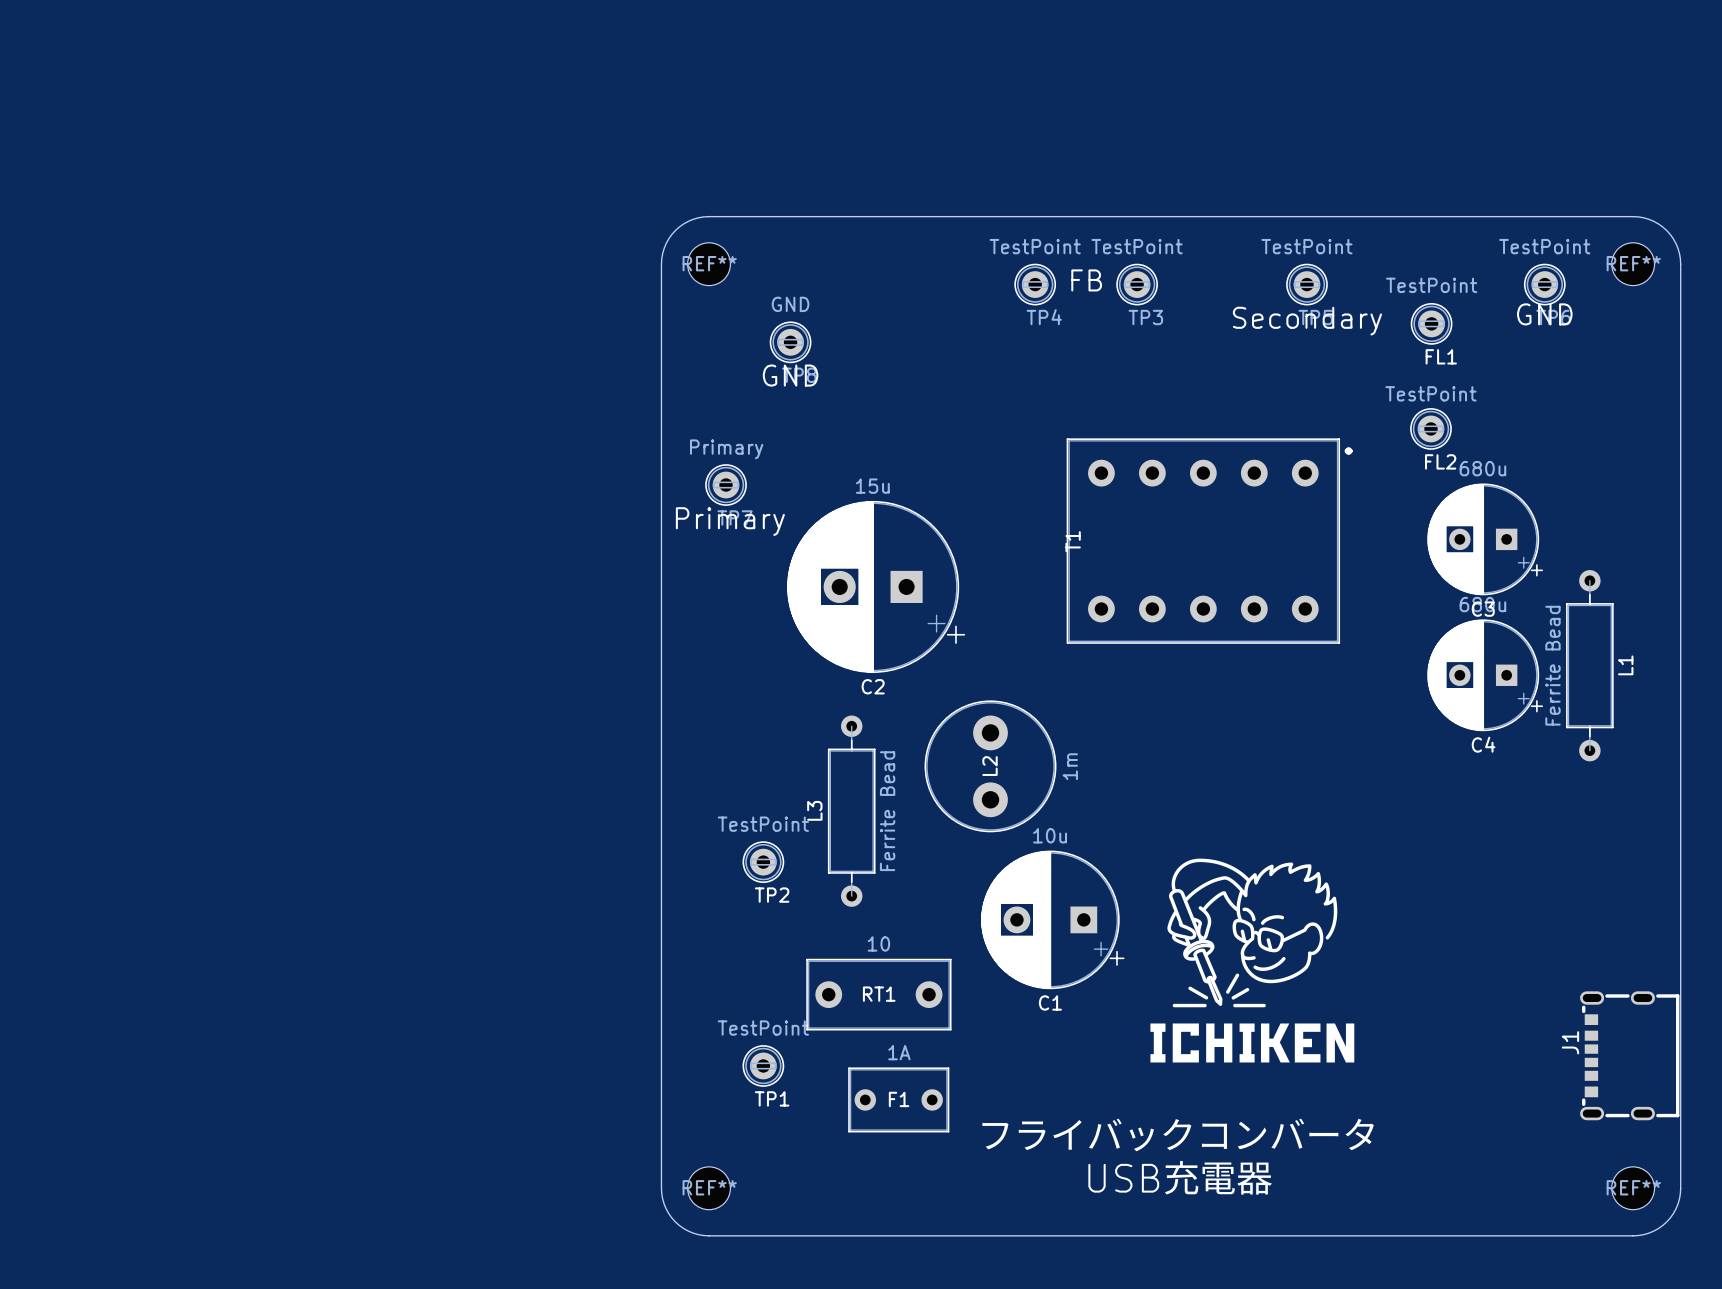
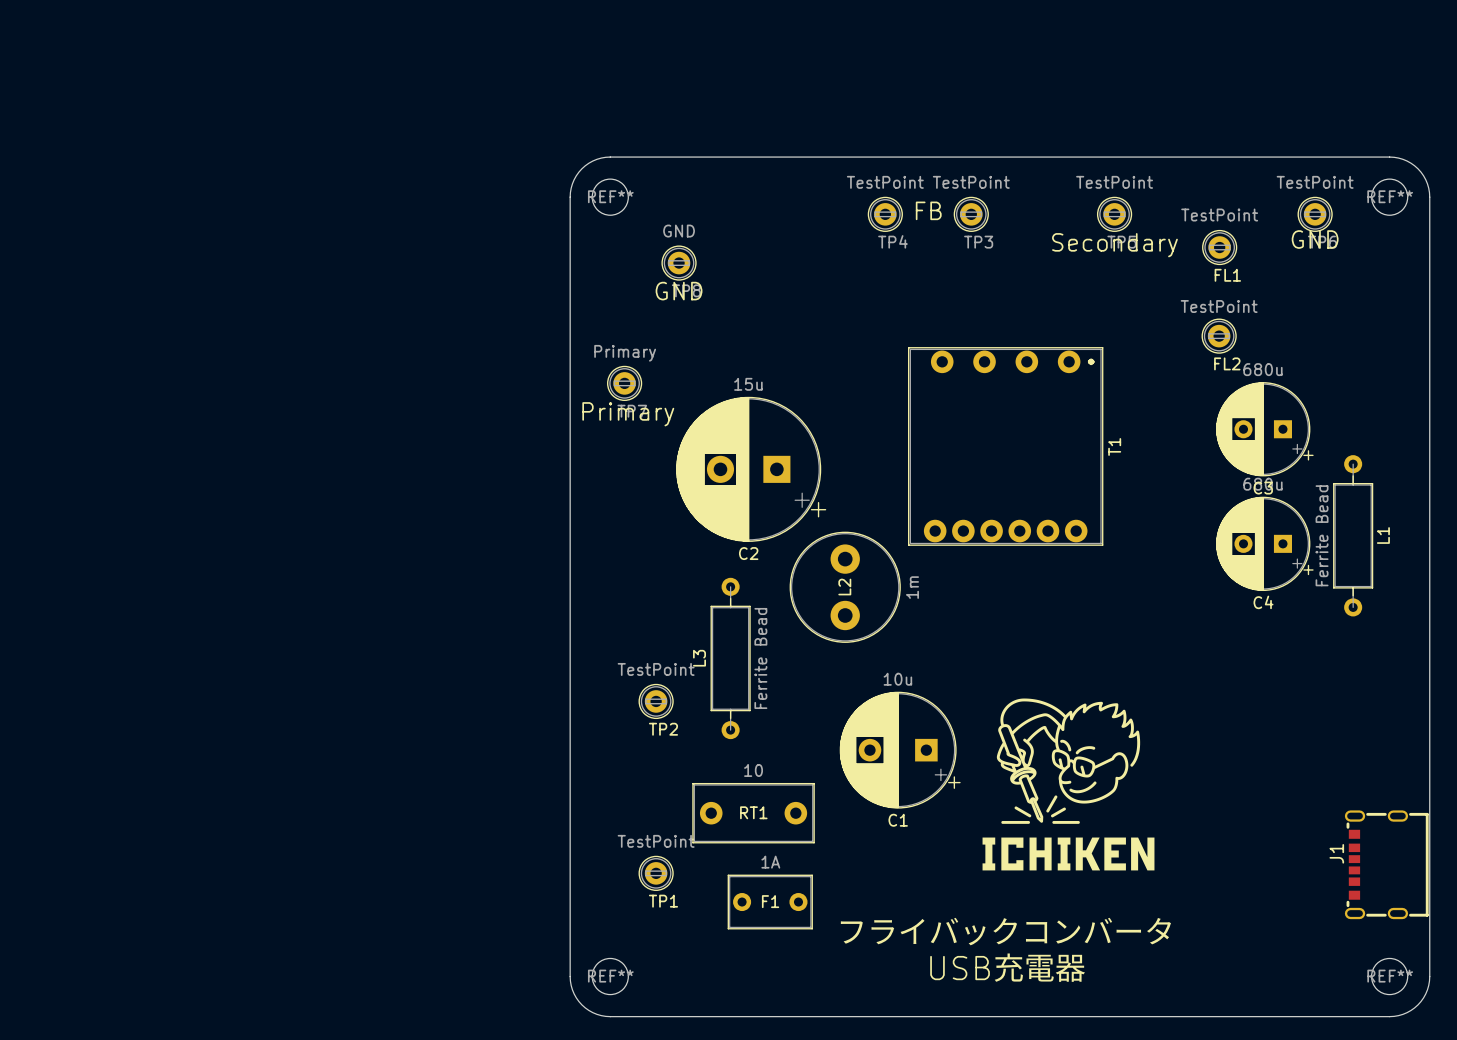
T1 footprint: [1066, 438, 1341, 644] -> [907, 347, 1104, 546]
T1 name position: T1 (1073, 541) -> T1 (1114, 446)
L2 position: (990, 766) -> (845, 587)

